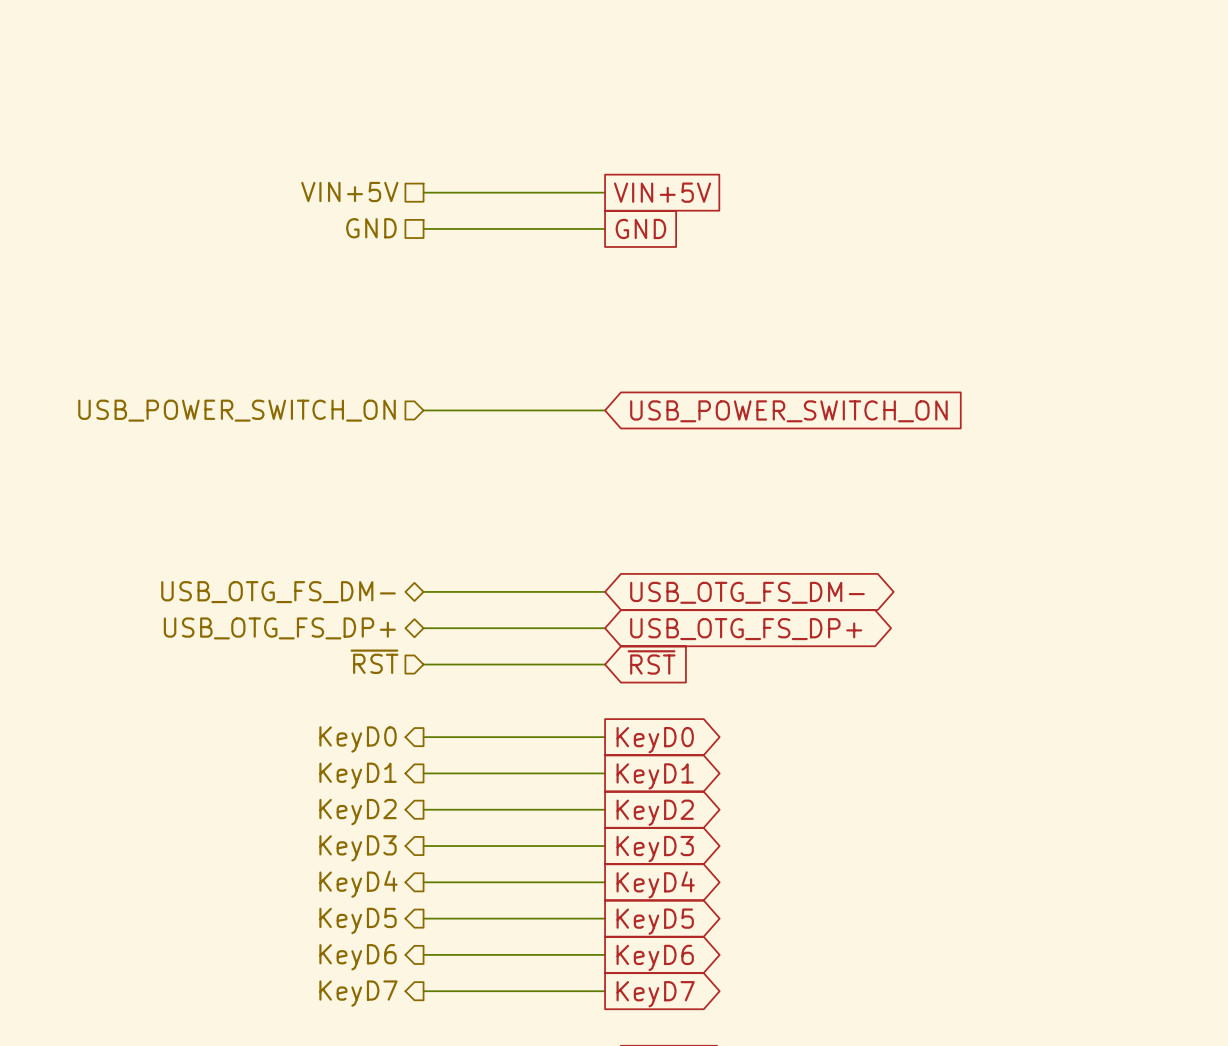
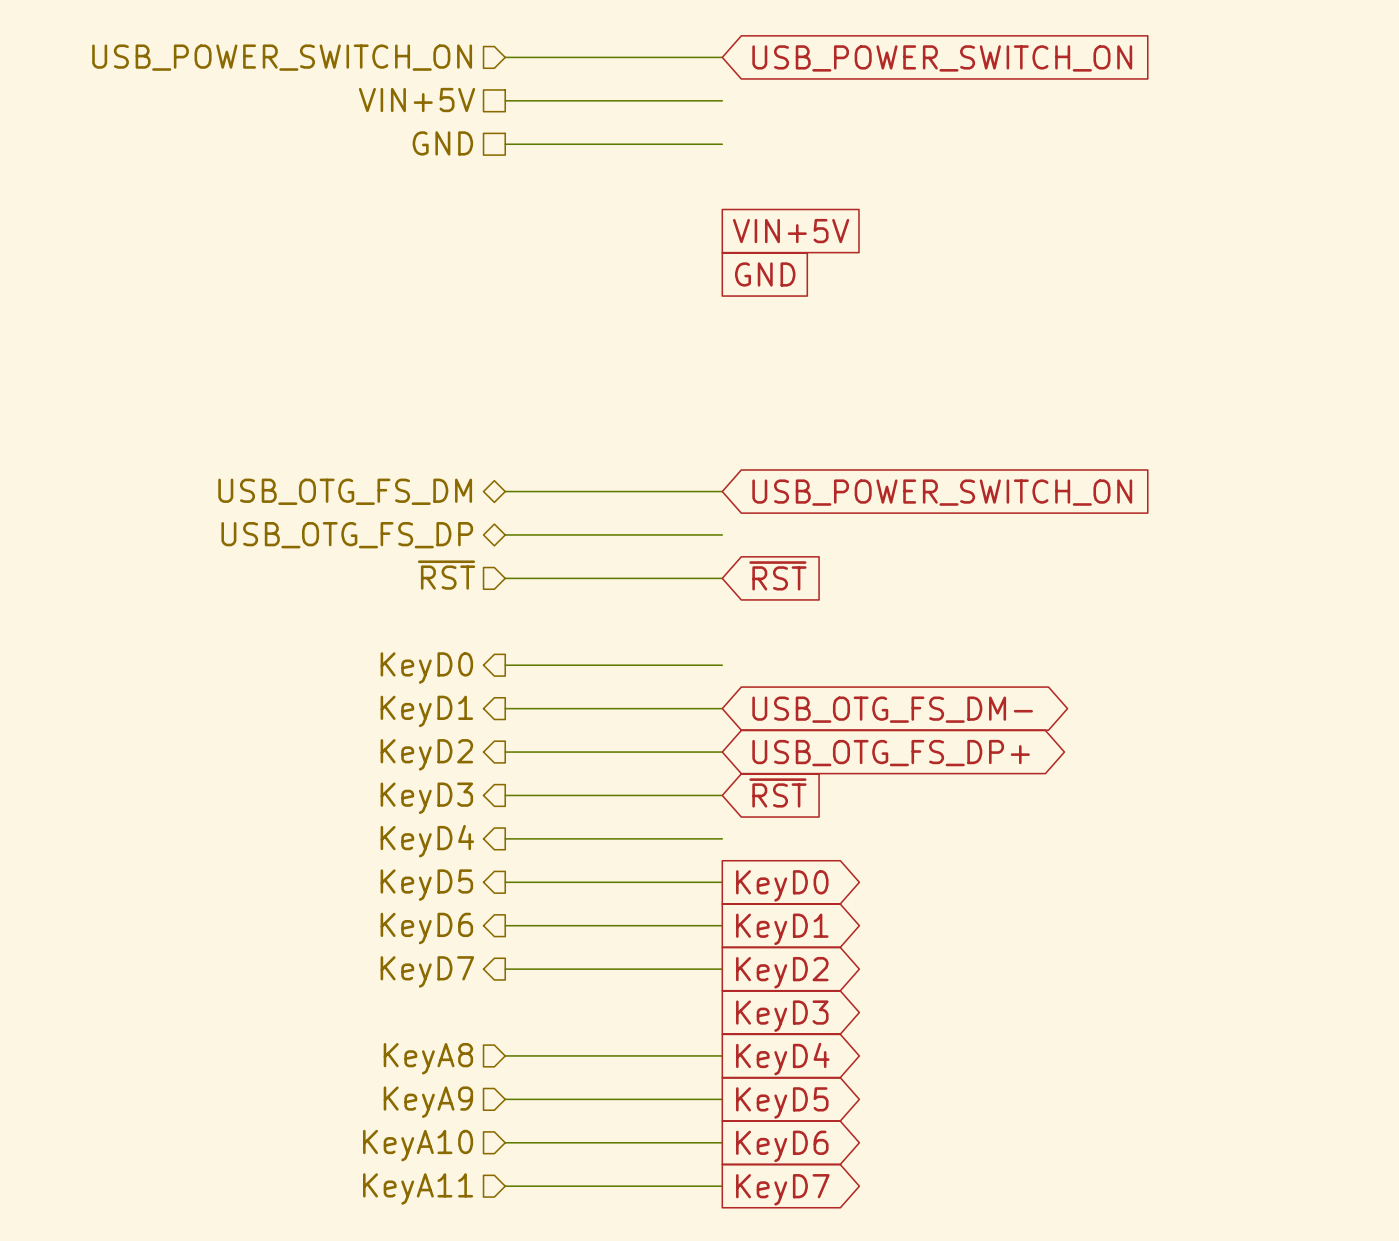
hierarchical label: none -> USB_POWER_SWITCH_ON (282, 57)
global label: none -> USB_POWER_SWITCH_ON (942, 58)
wire: none -> (505, 144) (722, 144)
hierarchical label position: VIN+5V (349, 191) -> VIN+5V (417, 100)
wire: (423, 192) (605, 192) -> (505, 57) (722, 57)
hierarchical label position: GND (371, 228) -> GND (442, 143)
wire: (423, 228) (605, 228) -> (505, 100) (722, 100)
hierarchical label shape: input (237, 410) -> bidirectional (345, 491)
hierarchical label: USB_POWER_SWITCH_ON (237, 410) -> USB_OTG_FS_DM (345, 491)
hierarchical label: none -> USB_OTG_FS_DP (347, 535)
wire: none -> (505, 534) (722, 534)
hierarchical label: none -> ~{RST} (446, 575)
global label: none -> ~{RST} (777, 575)
wire: none -> (505, 578) (722, 578)
wire: none -> (505, 665) (722, 665)
hierarchical label: none -> KeyD0 (426, 668)
hierarchical label shape: bidirectional (278, 592) -> output (426, 711)
hierarchical label: USB_OTG_FS_DM- (278, 592) -> KeyD1 (426, 711)
hierarchical label shape: bidirectional (279, 628) -> output (426, 754)
hierarchical label: USB_OTG_FS_DP+ (279, 628) -> KeyD2 (426, 754)
hierarchical label shape: input (374, 661) -> output (426, 798)
hierarchical label: ~{RST} (374, 661) -> KeyD3 (426, 798)
hierarchical label: none -> KeyD4 (427, 841)
hierarchical label: KeyD0 (358, 739) -> KeyD5 (426, 885)
hierarchical label: KeyD1 (358, 775) -> KeyD6 (426, 928)
hierarchical label: KeyD2 (358, 812) -> KeyD7 (427, 971)
wire: (423, 846) (605, 846) -> (505, 838) (722, 838)
hierarchical label: KeyD3 (358, 848) -> none
hierarchical label shape: output (358, 884) -> input (428, 1058)
hierarchical label: KeyD4 (358, 884) -> KeyA8 (428, 1058)
hierarchical label shape: output (358, 920) -> input (428, 1102)
hierarchical label: KeyD5 (358, 920) -> KeyA9 (428, 1102)
hierarchical label shape: output (358, 957) -> input (418, 1145)
hierarchical label: KeyD6 (358, 957) -> KeyA10 (418, 1145)
hierarchical label shape: output (358, 993) -> input (418, 1189)
hierarchical label: KeyD7 (358, 993) -> KeyA11 (418, 1189)

